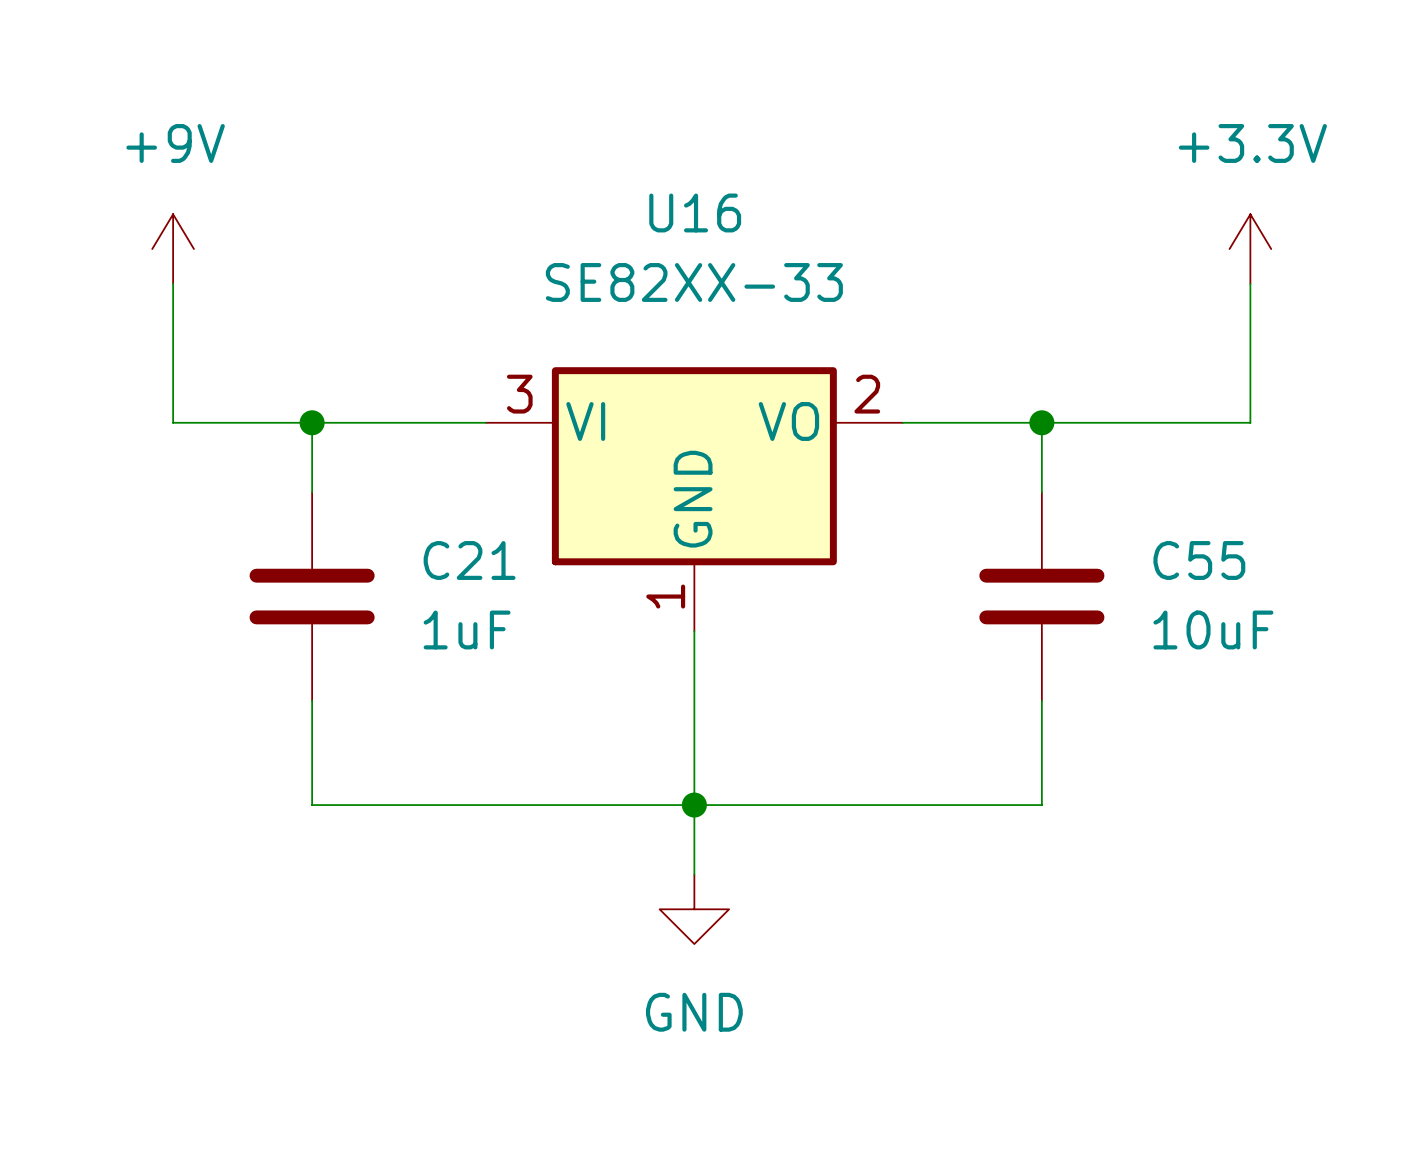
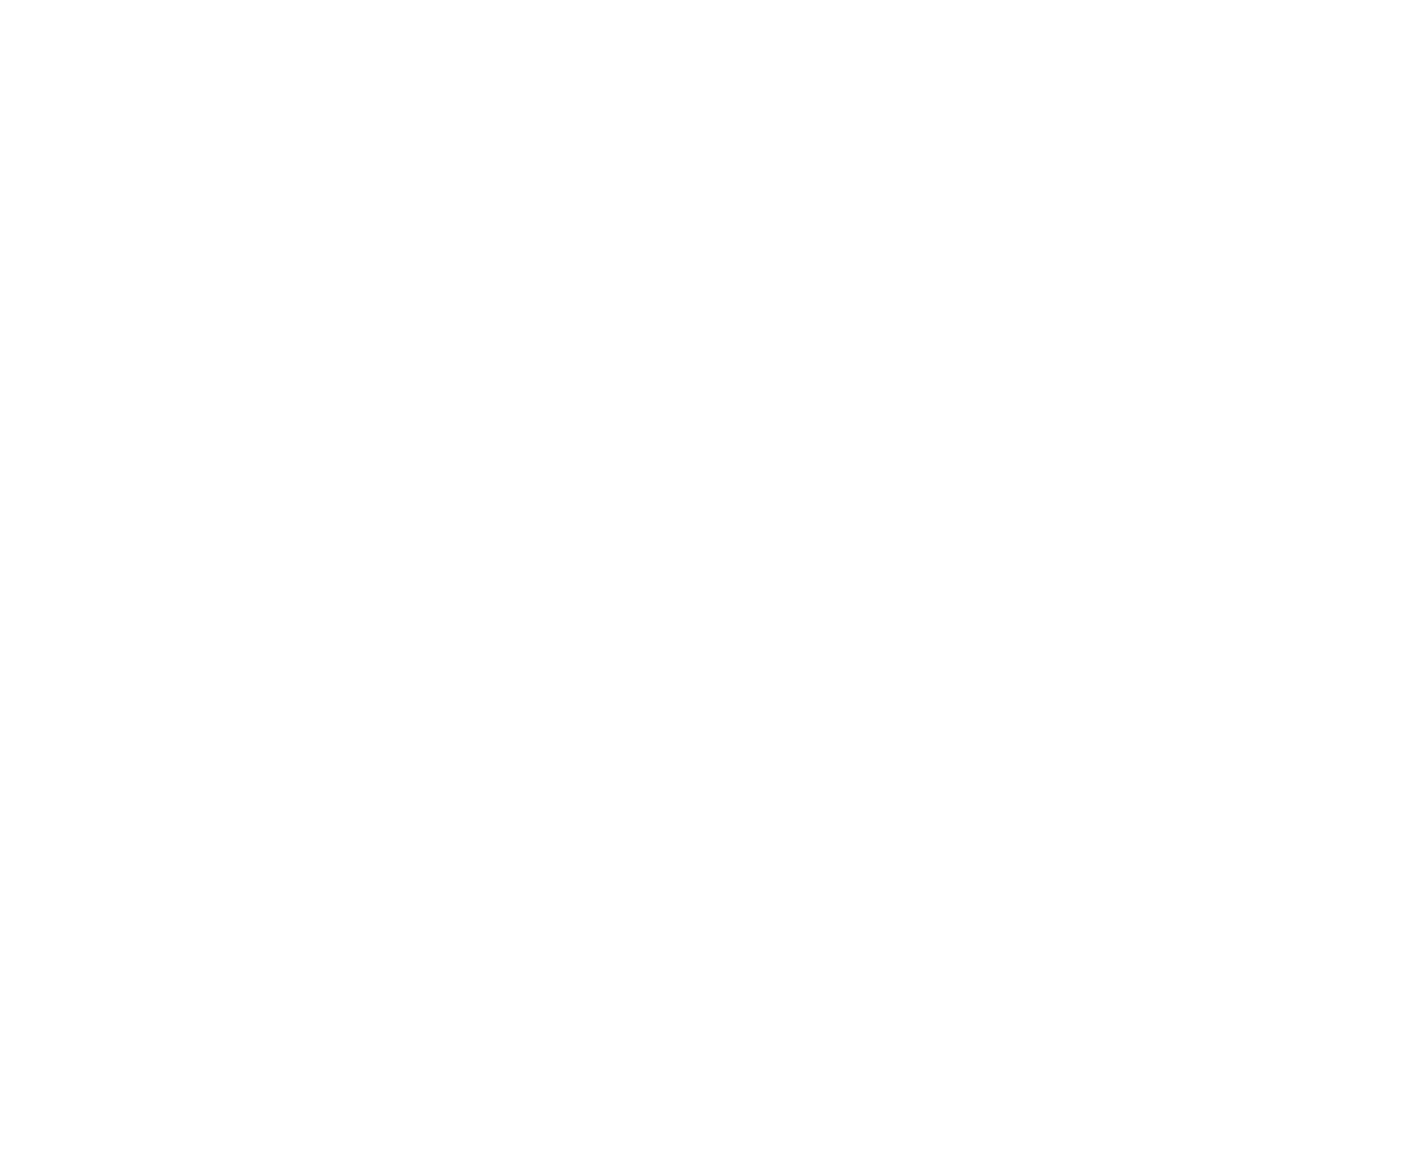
power symbol: +9V (173, 249) -> none
power symbol: +3.3V (1250, 249) -> none
wire: (173, 283) (173, 422) (485, 422) -> none
wire: (1250, 283) (1250, 422) (902, 422) -> none
wire: (312, 422) (312, 492) -> none
junction: (312, 422) -> none
wire: (1041, 422) (1041, 492) -> none
junction: (1041, 422) -> none
U16: SE82XX-33 (694, 499) -> none
C21: 1uF (312, 596) -> none
C55: 10uF (1041, 596) -> none
wire: (694, 631) (694, 874) -> none
wire: (312, 700) (312, 805) (1041, 805) (1041, 700) -> none
junction: (694, 805) -> none
power symbol: GND (694, 909) -> none

